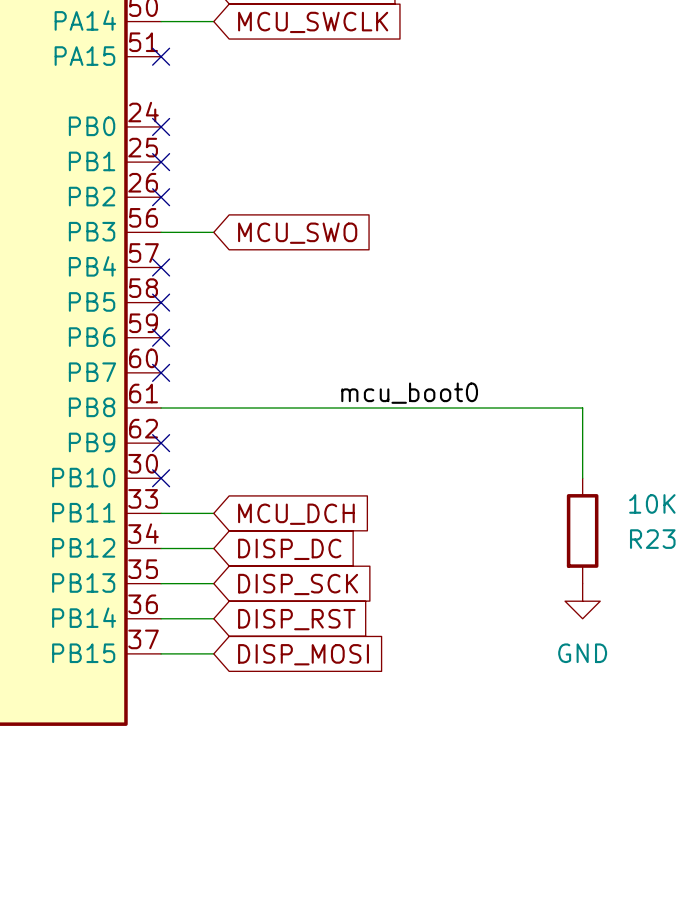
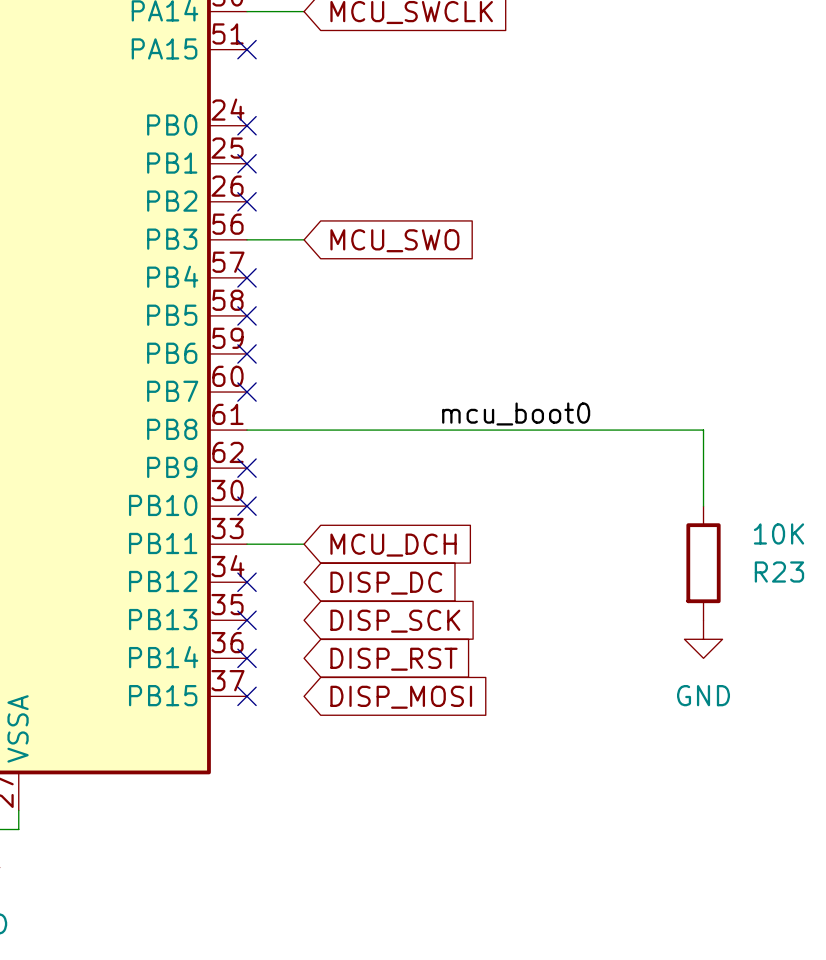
wire: (161, 548) (213, 548) -> none
no-connect mark: none -> (247, 582)
wire: (161, 583) (213, 583) -> none
no-connect mark: none -> (247, 620)
wire: (161, 618) (213, 618) -> none
no-connect mark: none -> (247, 658)
wire: (161, 653) (213, 653) -> none
no-connect mark: none -> (247, 696)

